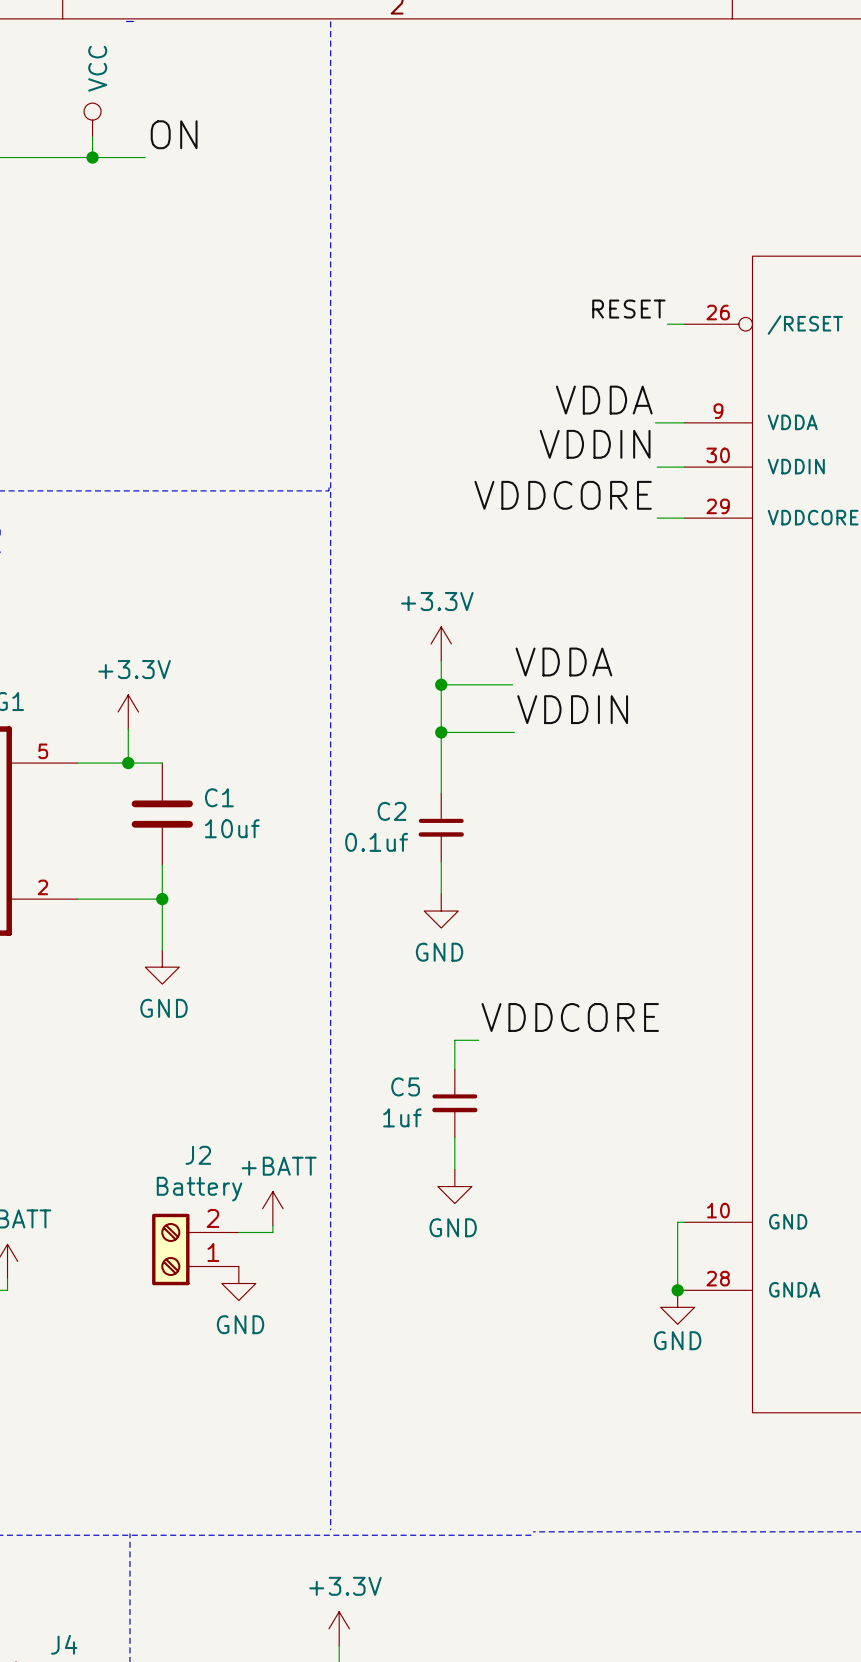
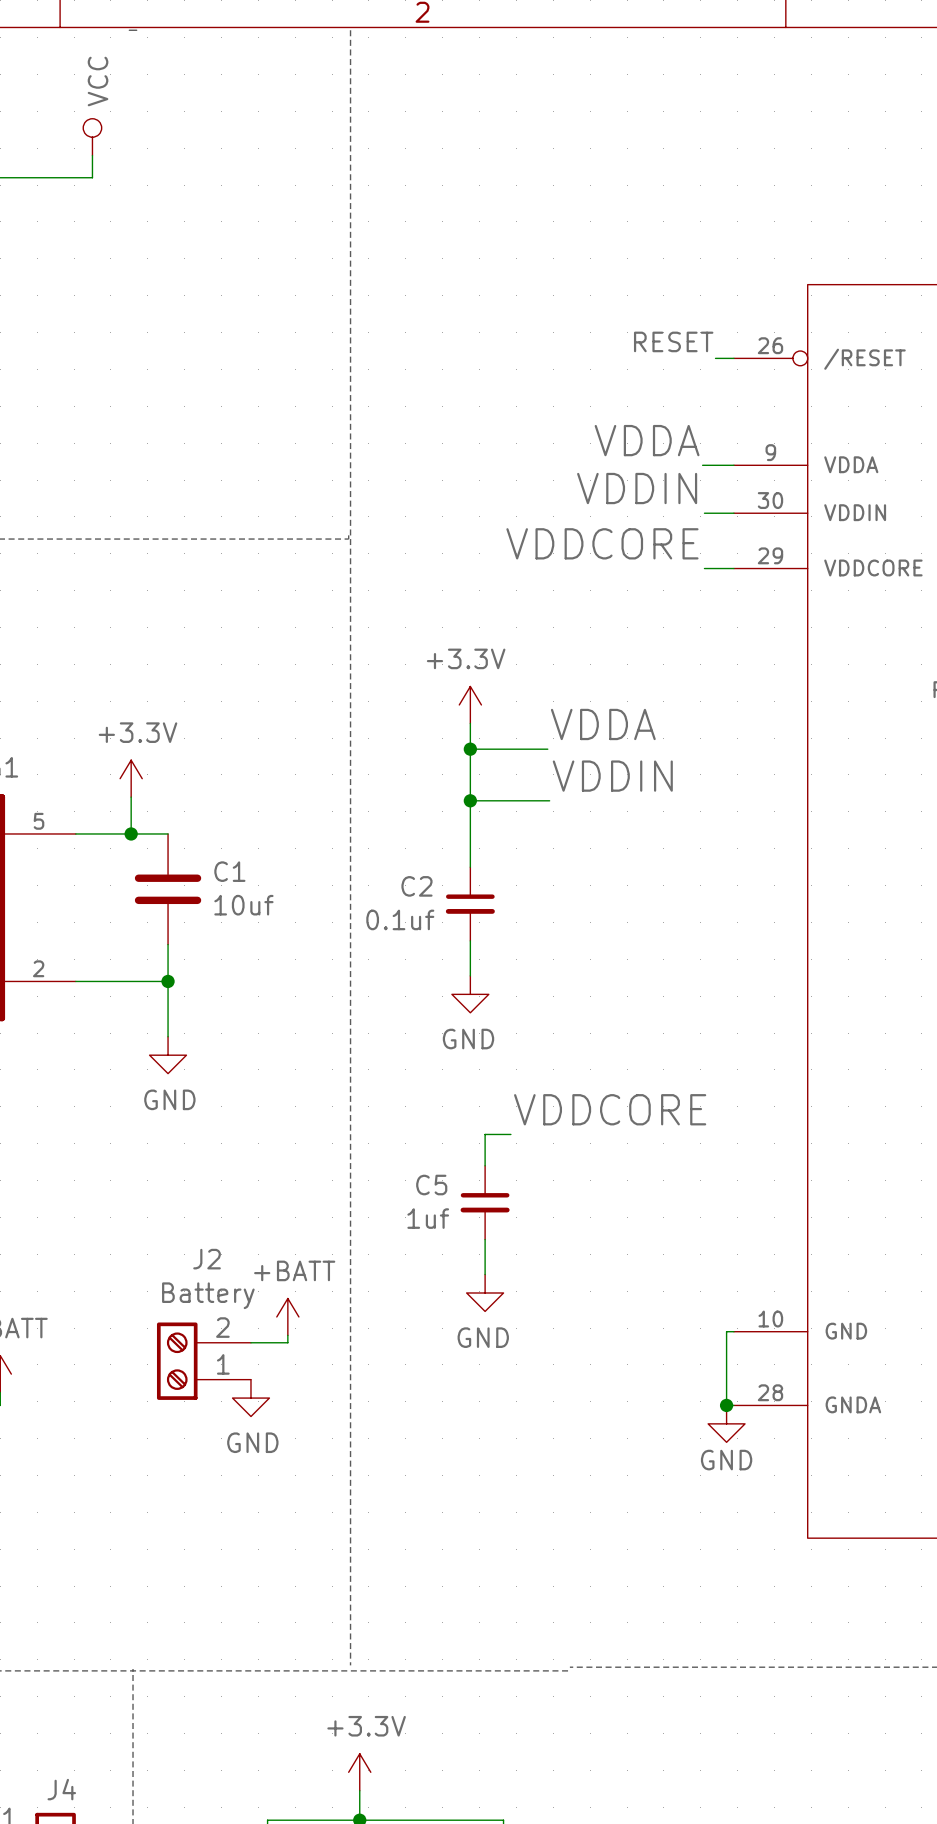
label: ON (174, 134) -> none
wire: (92, 157) (145, 157) -> none
junction: (92, 157) -> none

